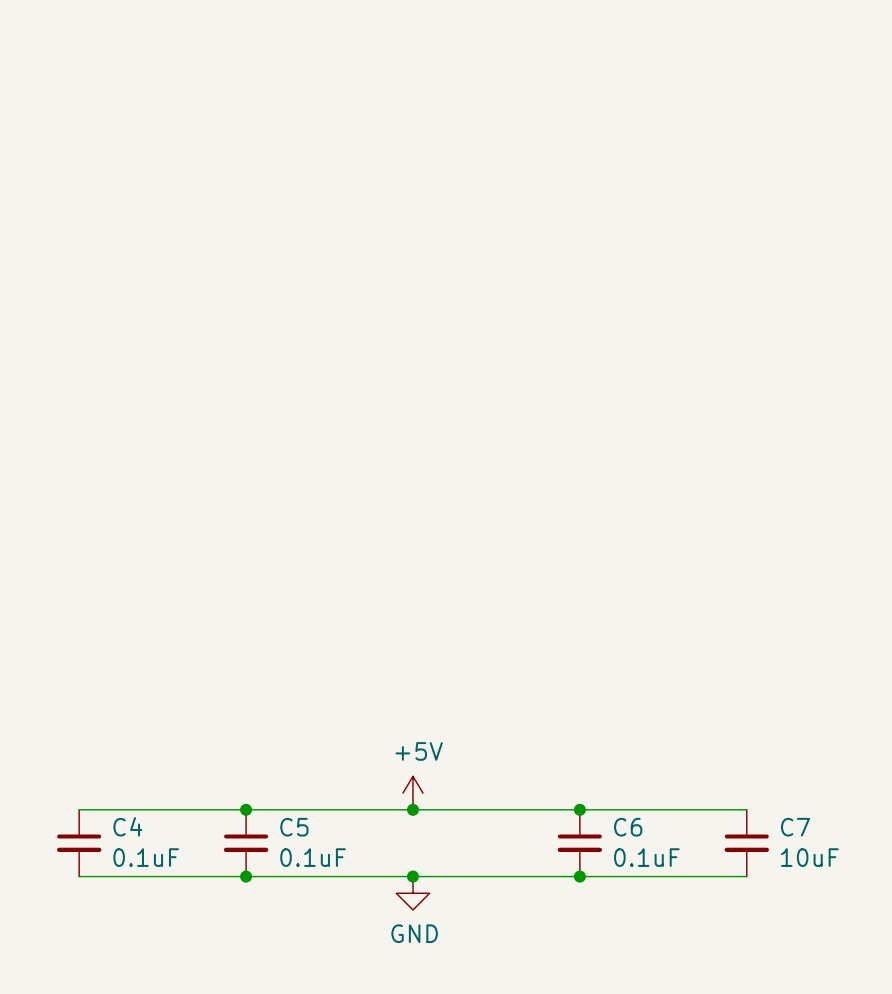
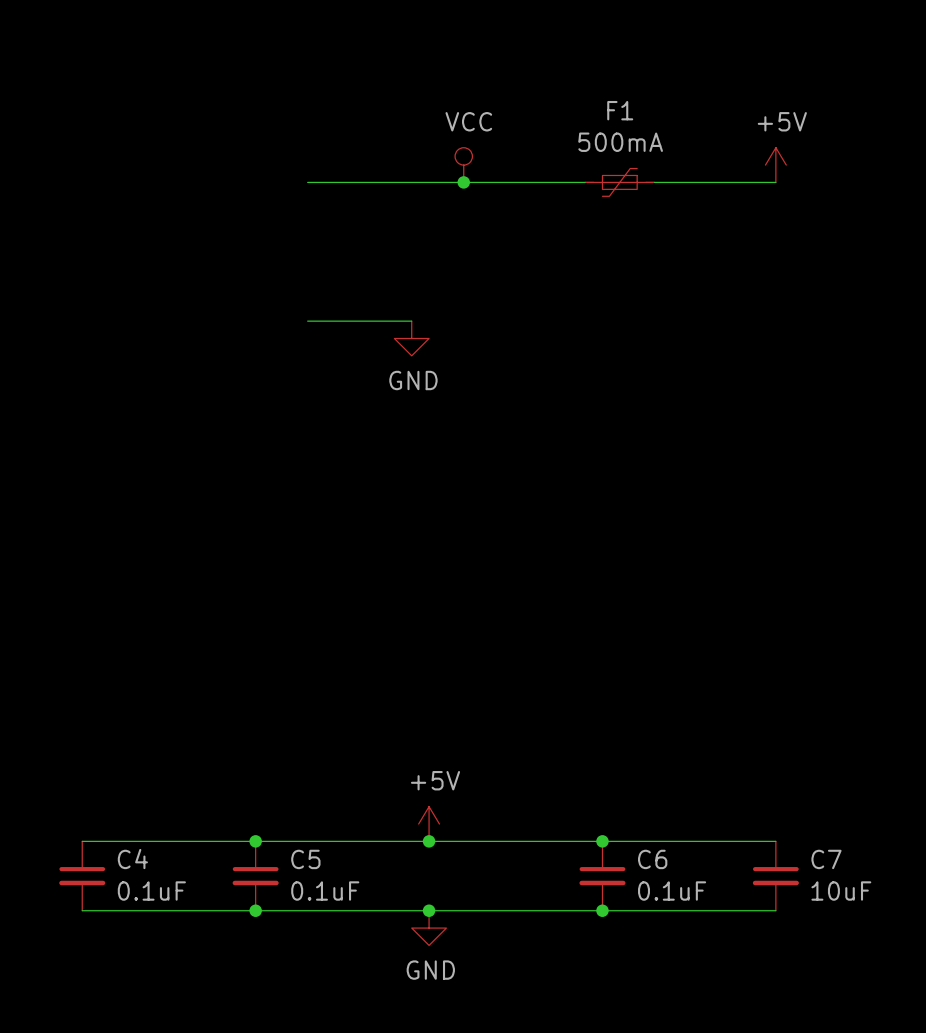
power symbol: none -> VCC (463, 165)
power symbol: none -> +5V (775, 165)
wire: none -> (307, 182) (585, 182)
junction: none -> (463, 182)
F1: none -> 500mA (619, 182)
wire: none -> (654, 182) (775, 182)
wire: none -> (307, 321) (411, 321)
power symbol: none -> GND (411, 338)

